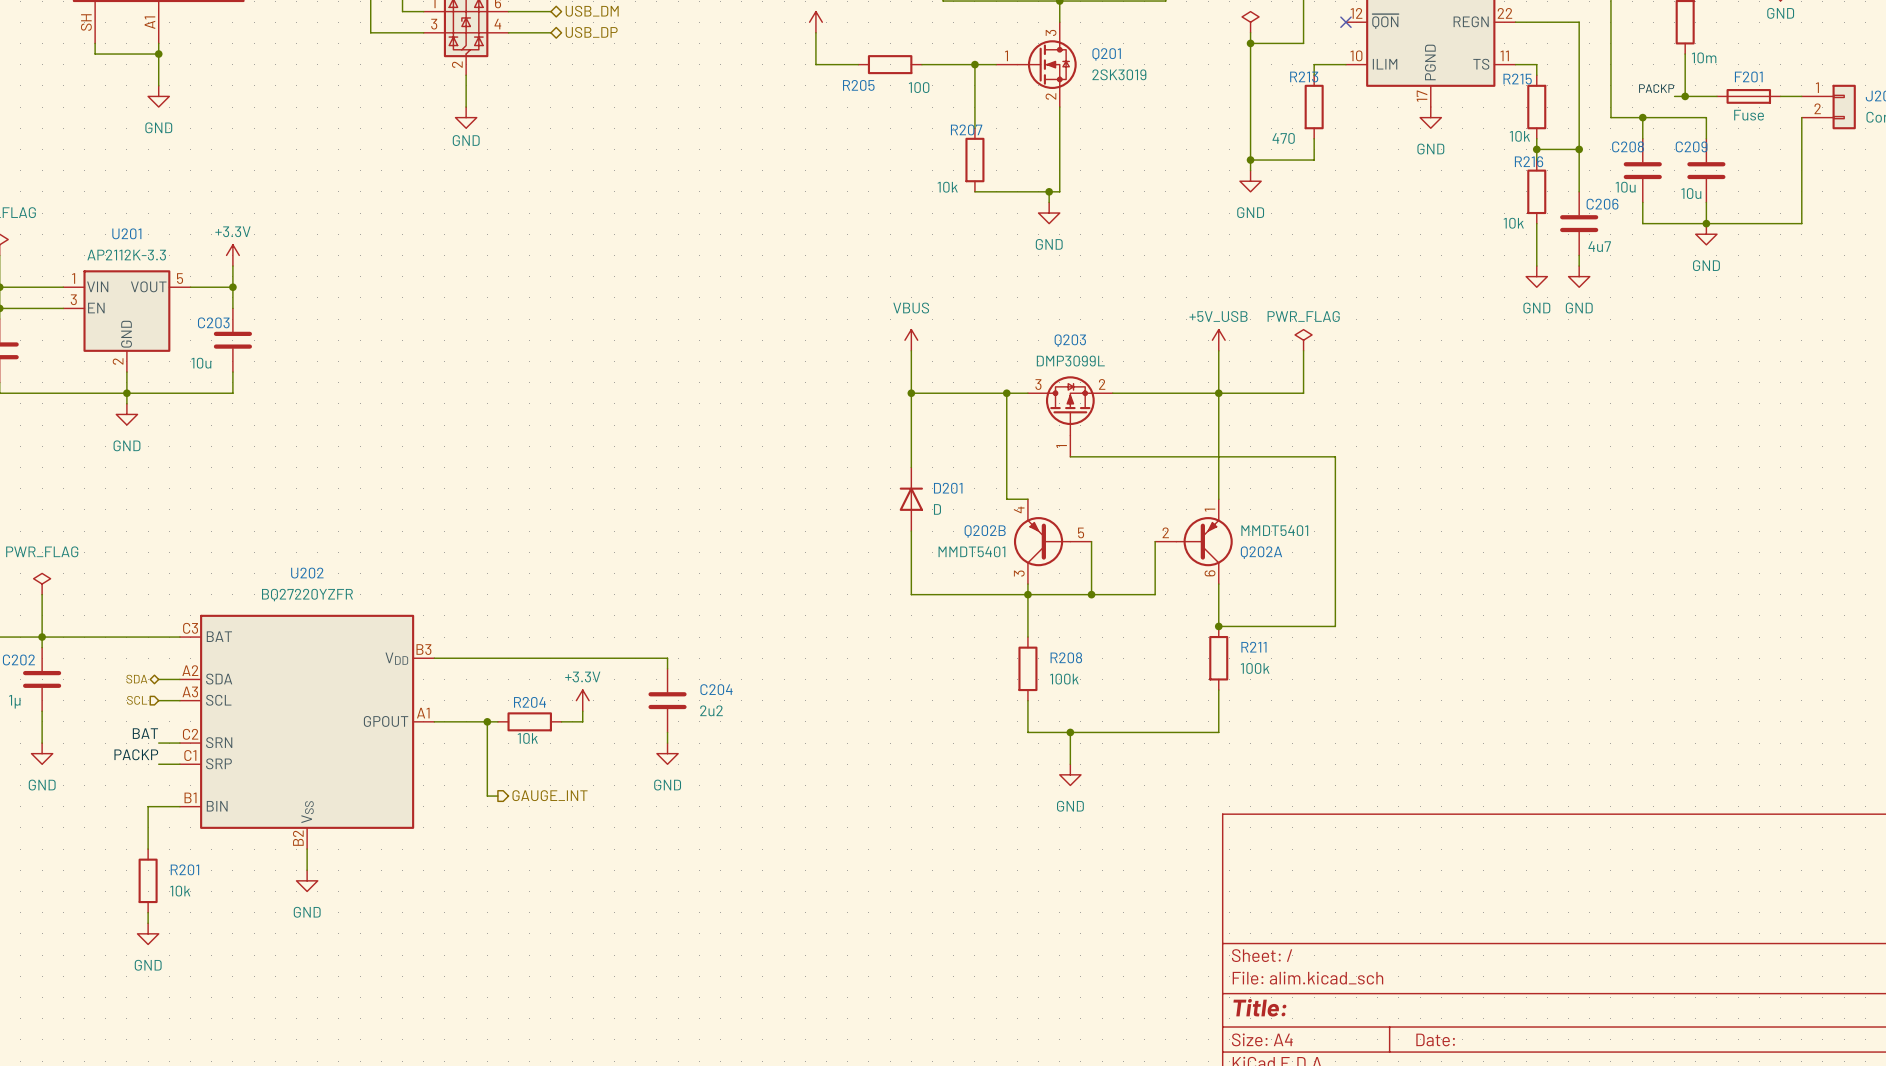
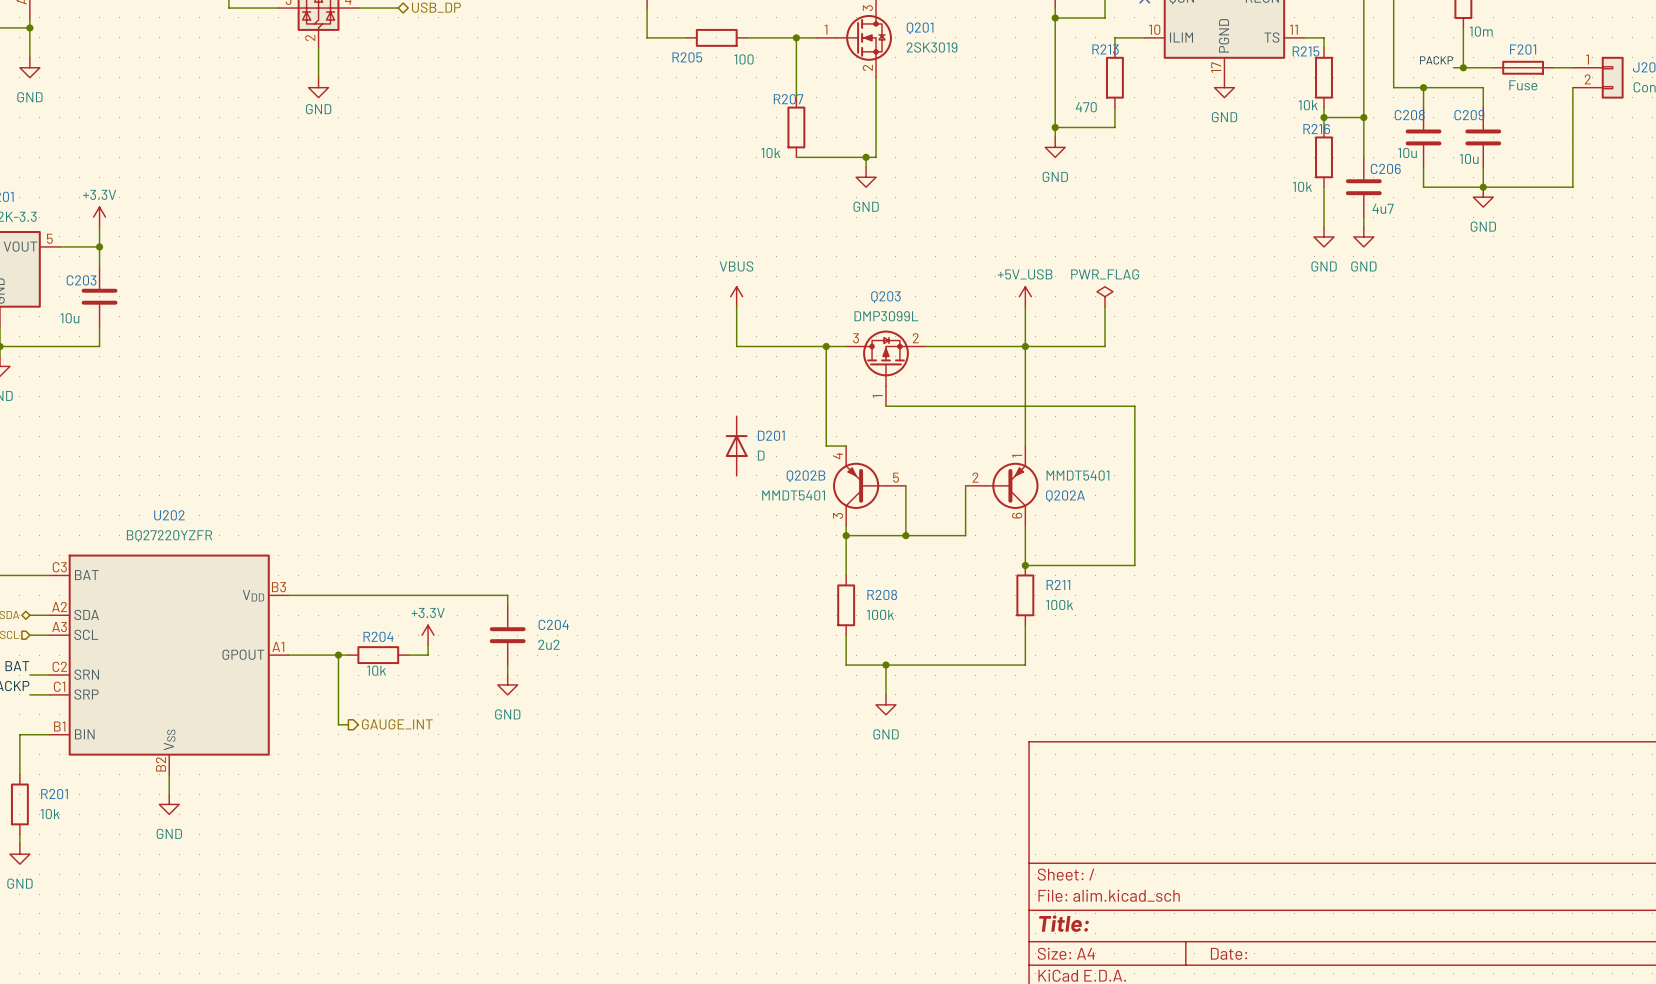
wire: (911, 393) (911, 467) -> none
junction: (911, 393) -> none
wire: (911, 531) (911, 594) (1027, 594) -> none

